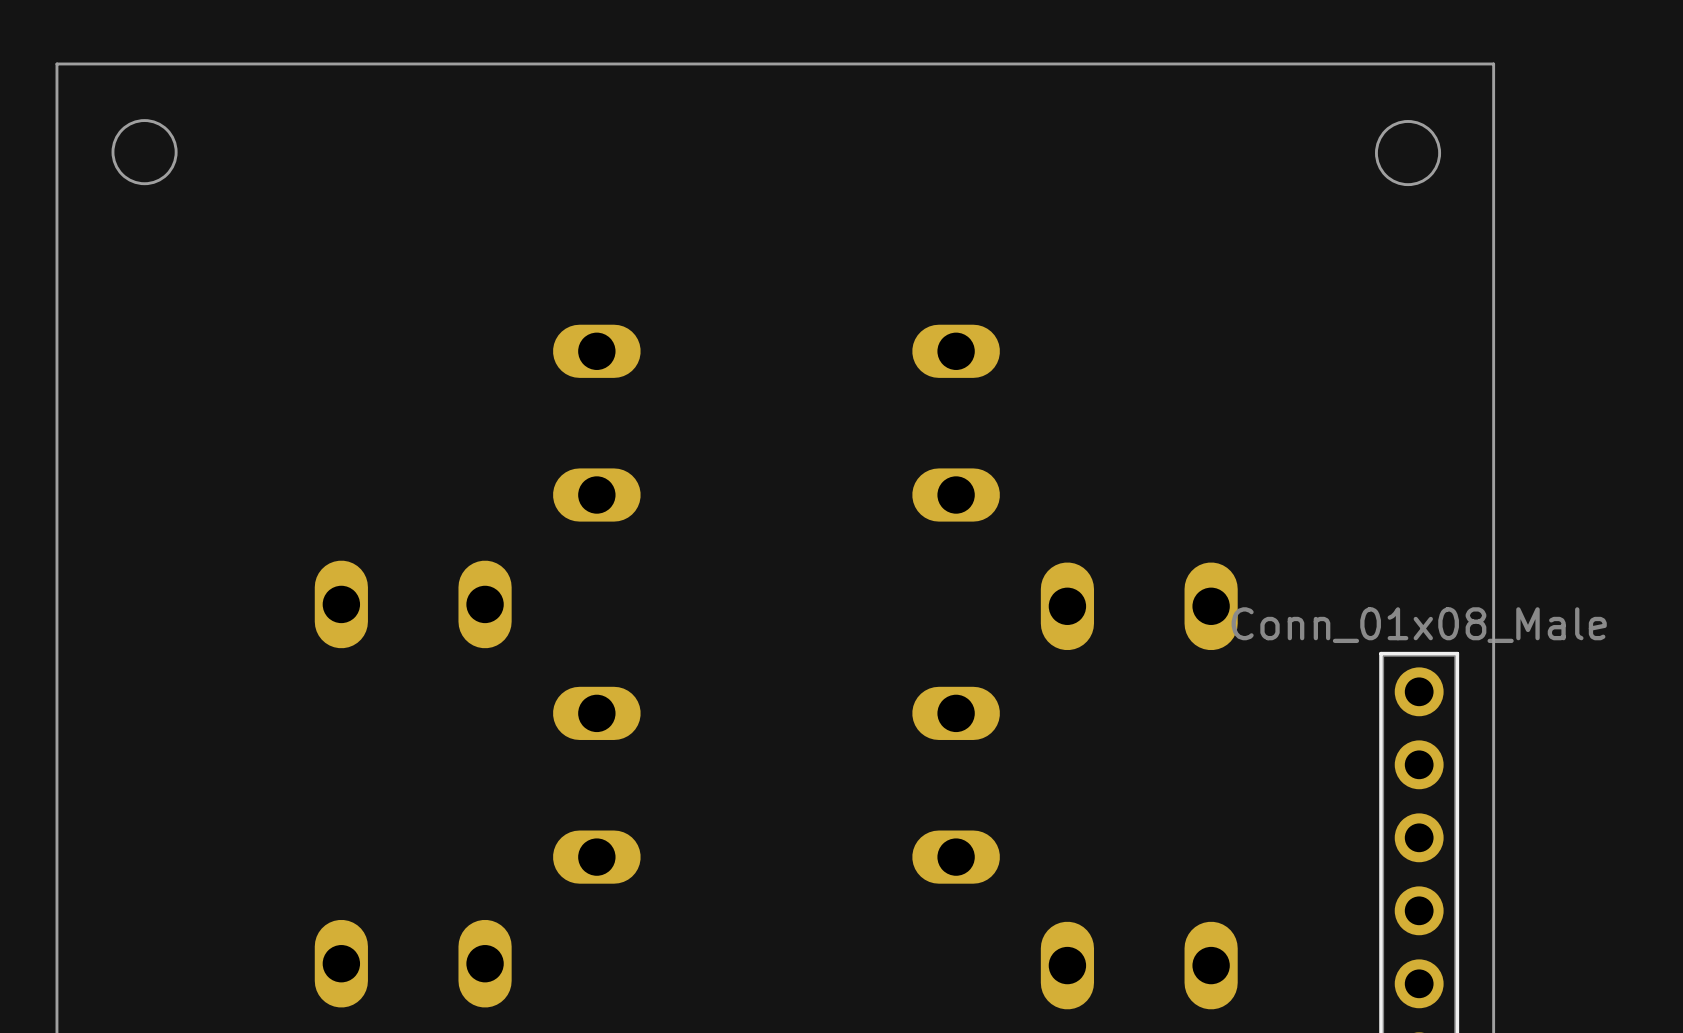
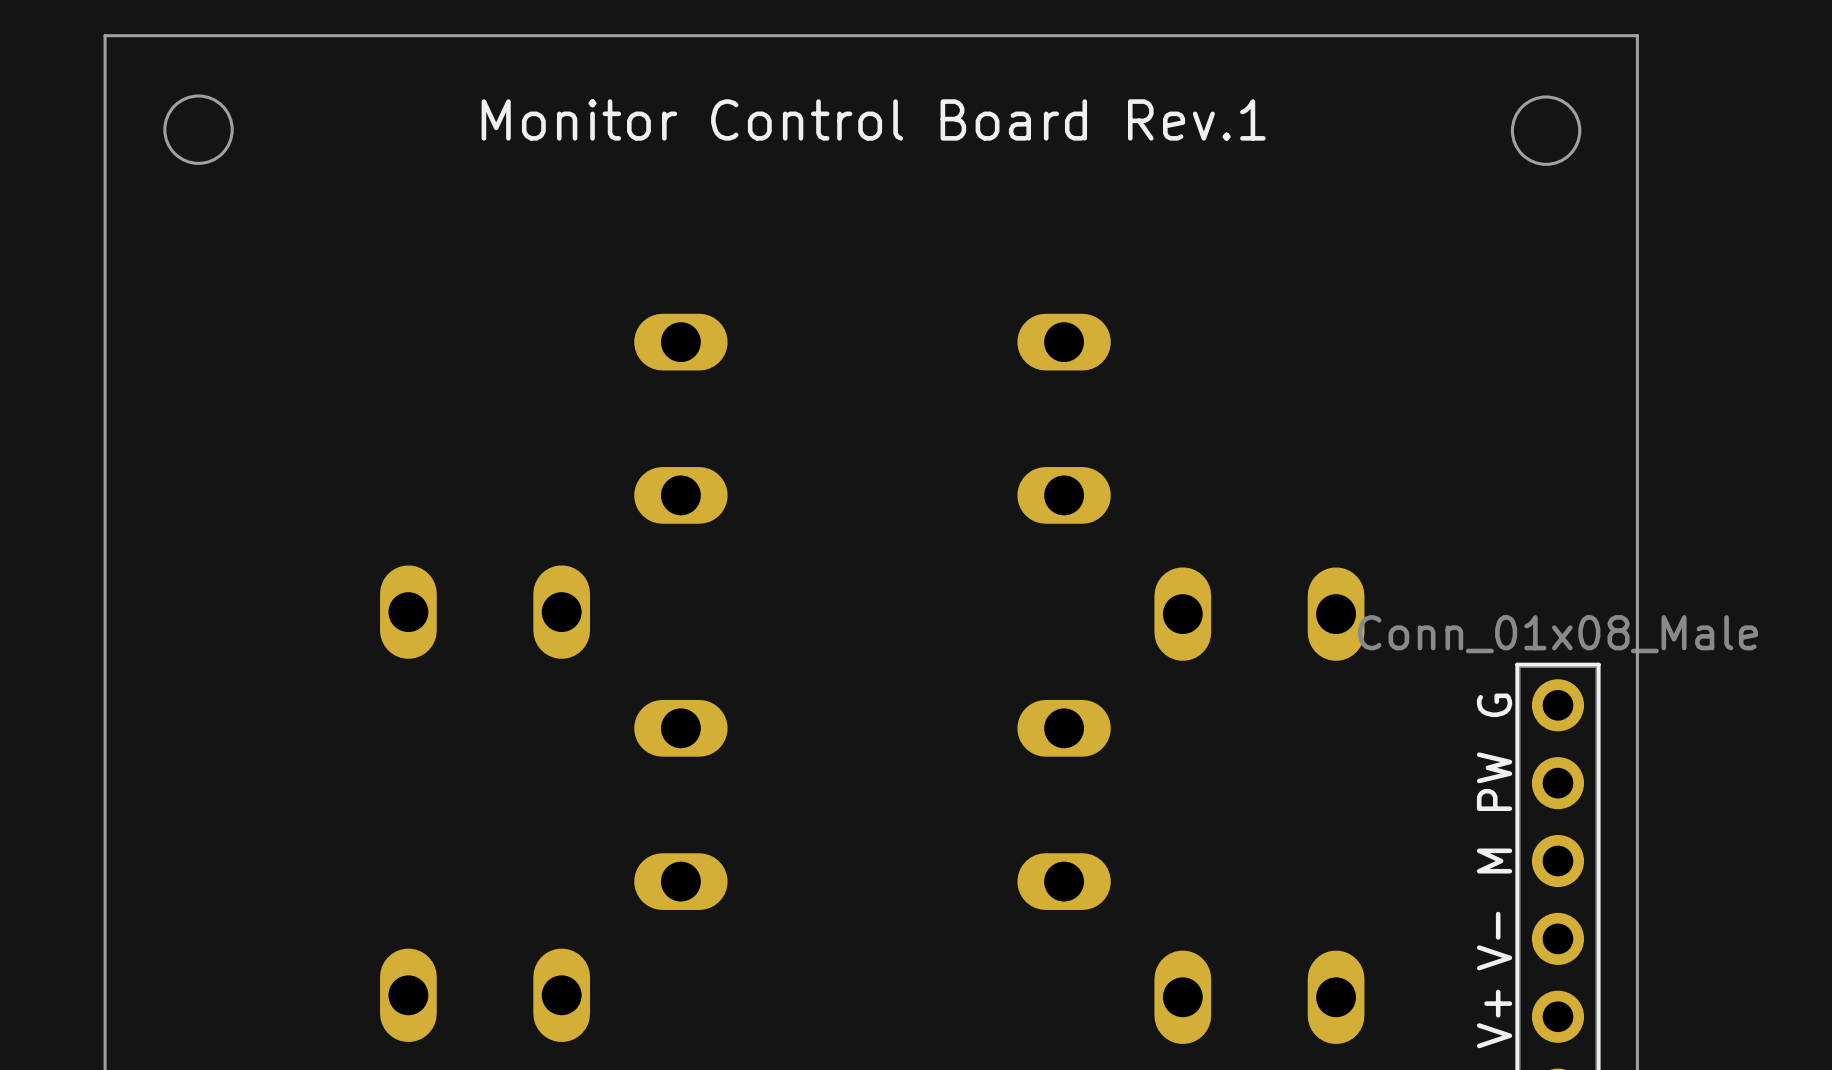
text: none -> Monitor Control Board Rev.1 (873, 119)
text: none -> G (1494, 705)
text: none -> PW (1494, 781)
text: none -> M (1494, 861)
text: none -> V- (1494, 941)
text: none -> V+ (1494, 1018)

